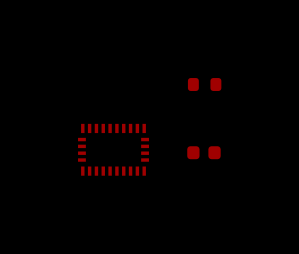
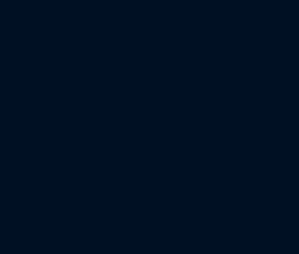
part: (204, 84) -> none
part: (113, 149) -> none
part: (203, 152) -> none

